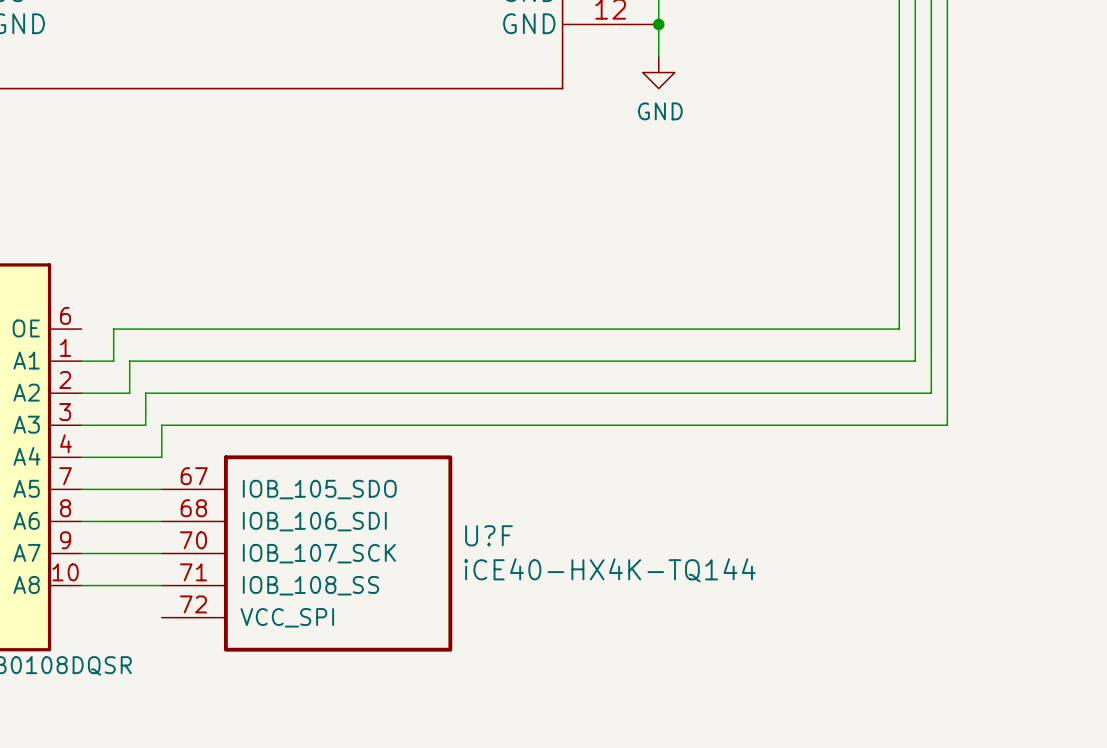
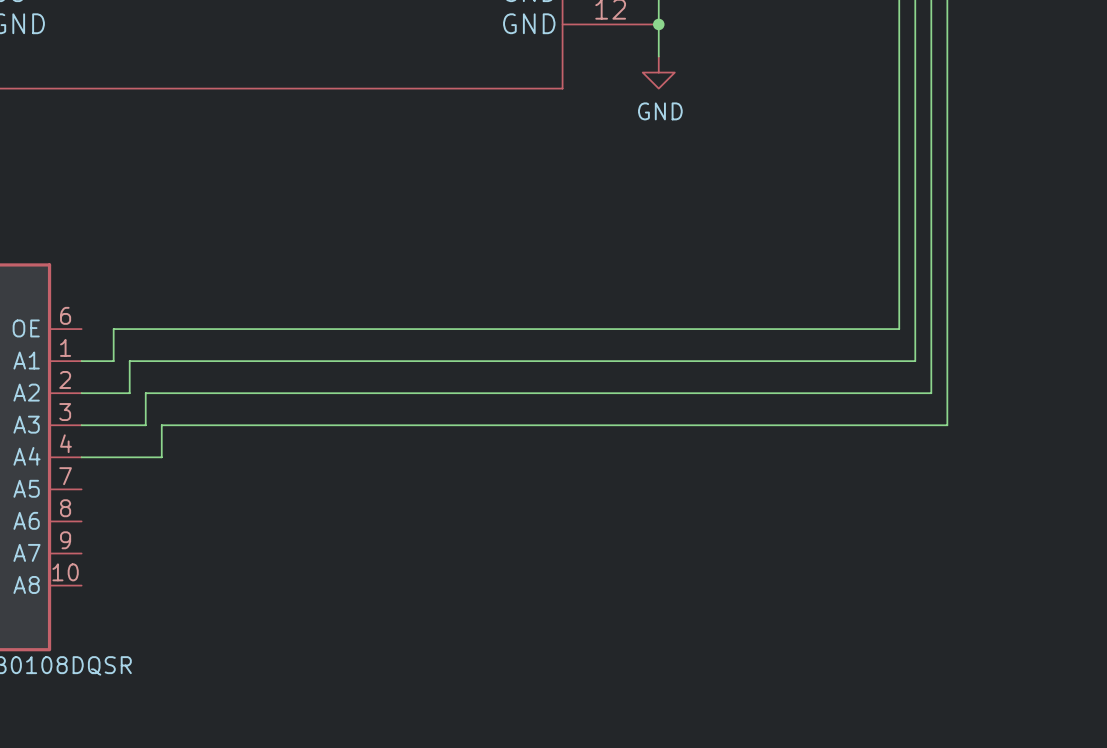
wire: (81, 489) (161, 489) -> none
wire: (81, 521) (161, 521) -> none
wire: (81, 553) (161, 553) -> none
U?F: iCE40-HX4K-TQ144 (307, 553) -> none
wire: (81, 585) (161, 585) -> none

